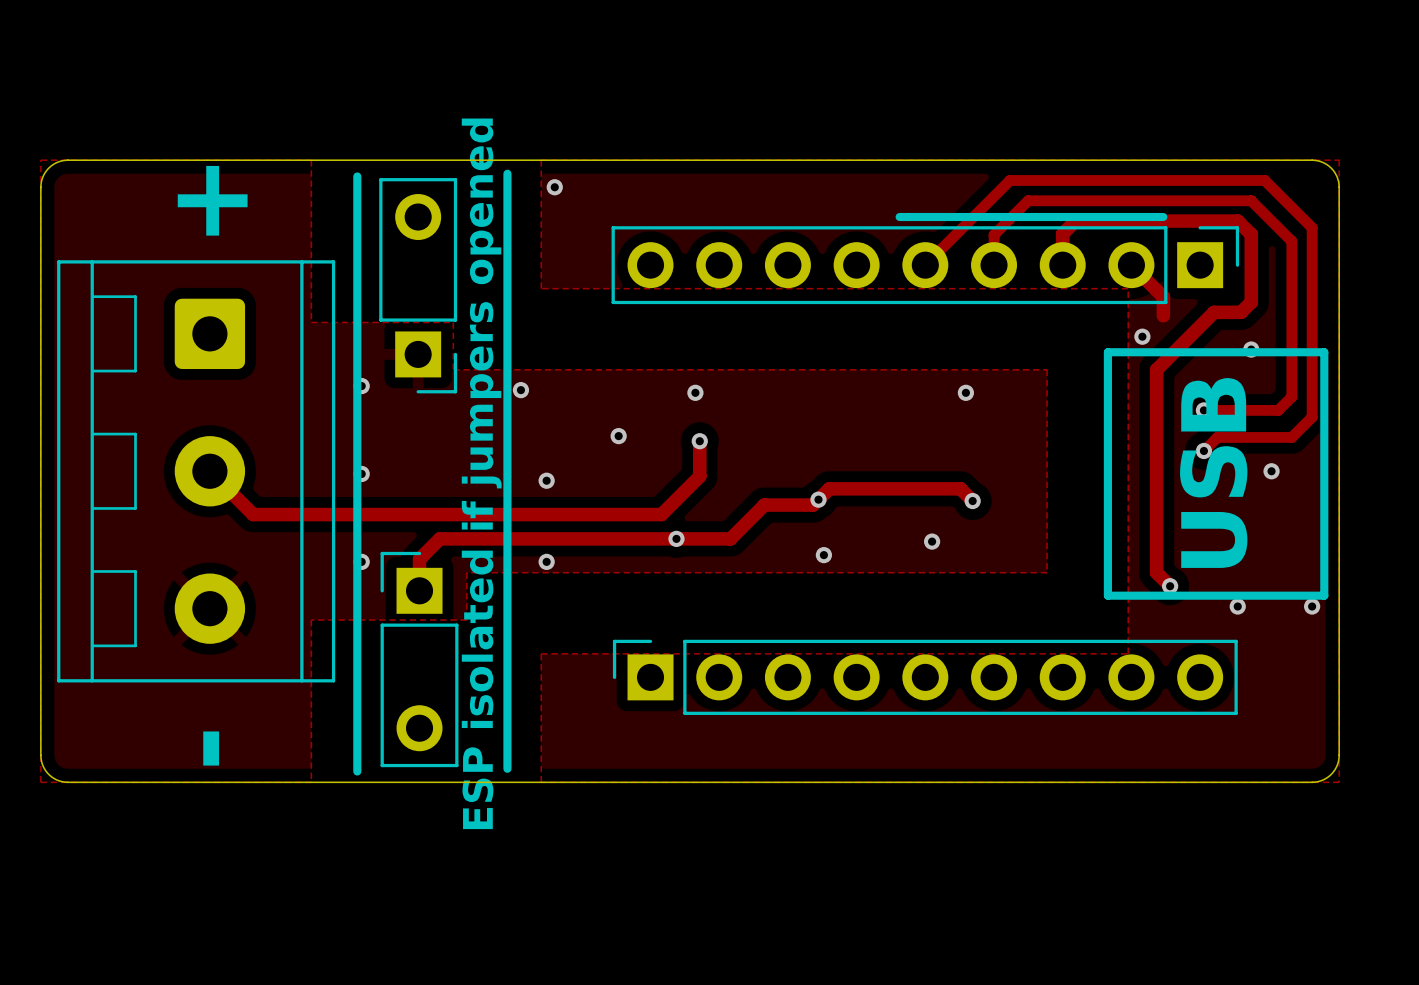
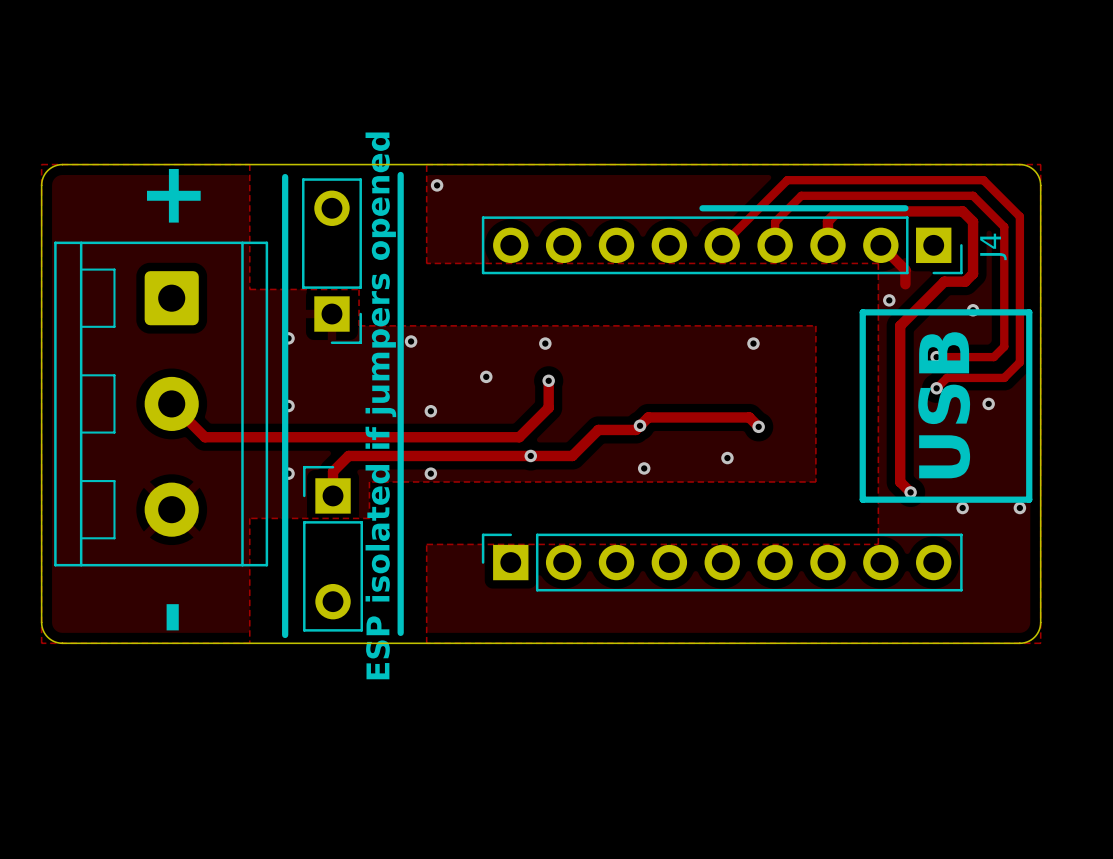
part: (925, 265) -> none
J4: none -> (722, 245)

